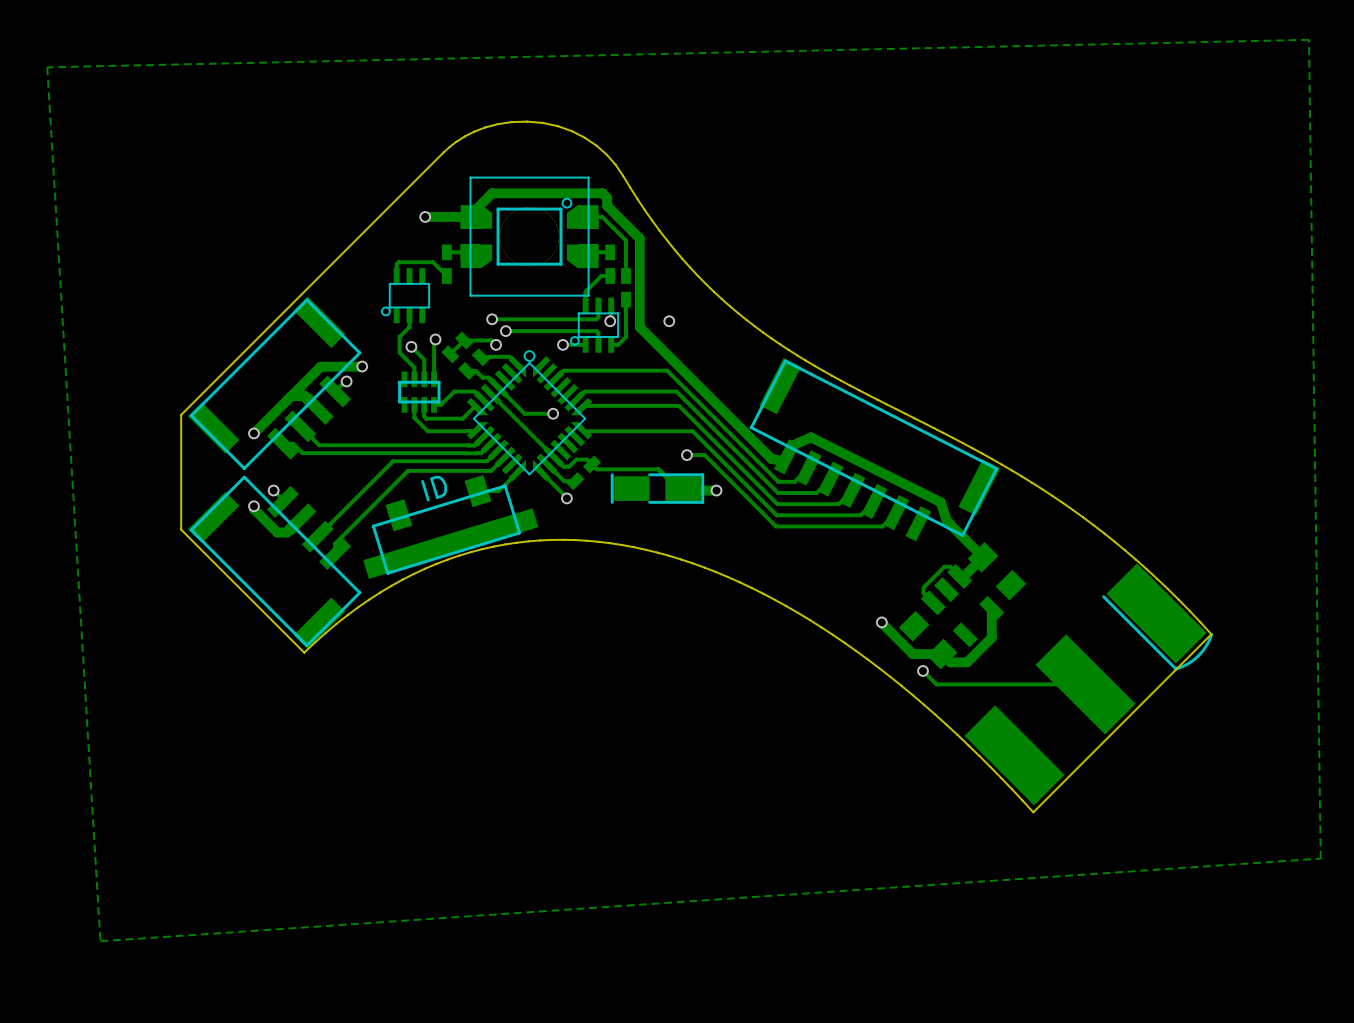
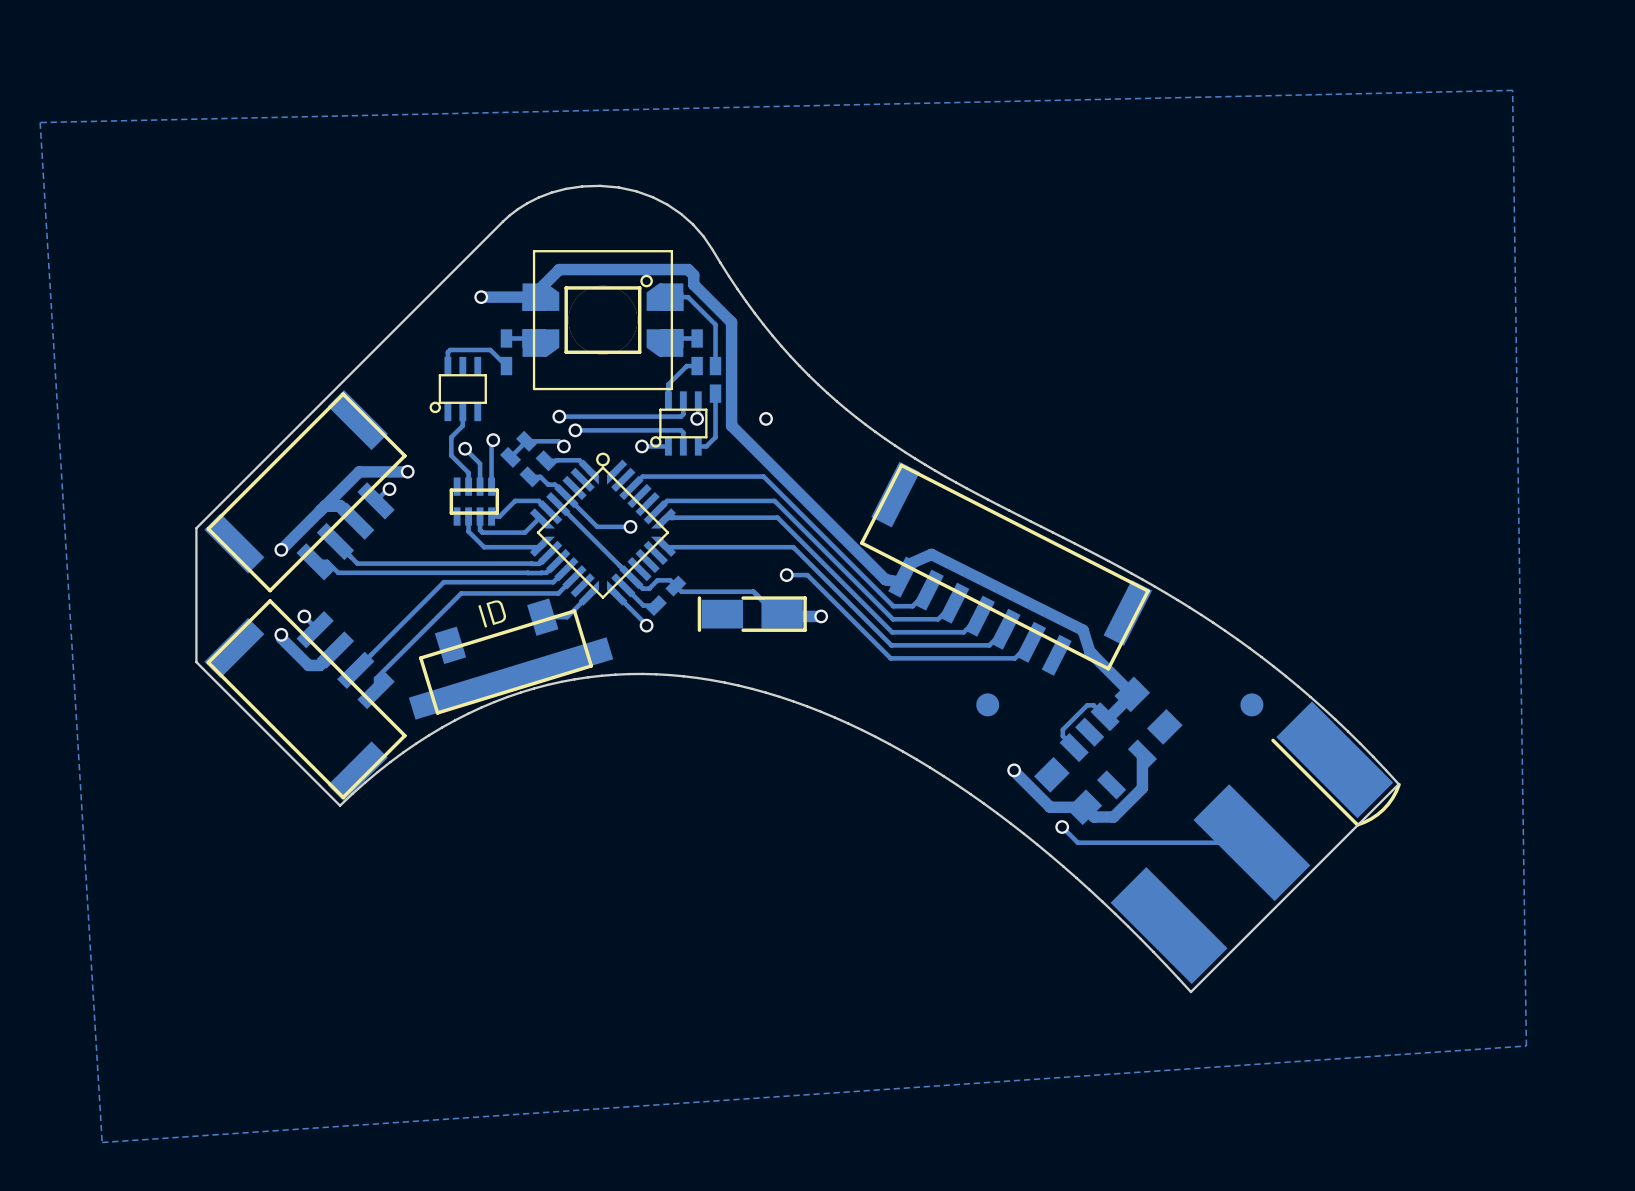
part: none -> (987, 704)
part: none -> (1251, 704)

